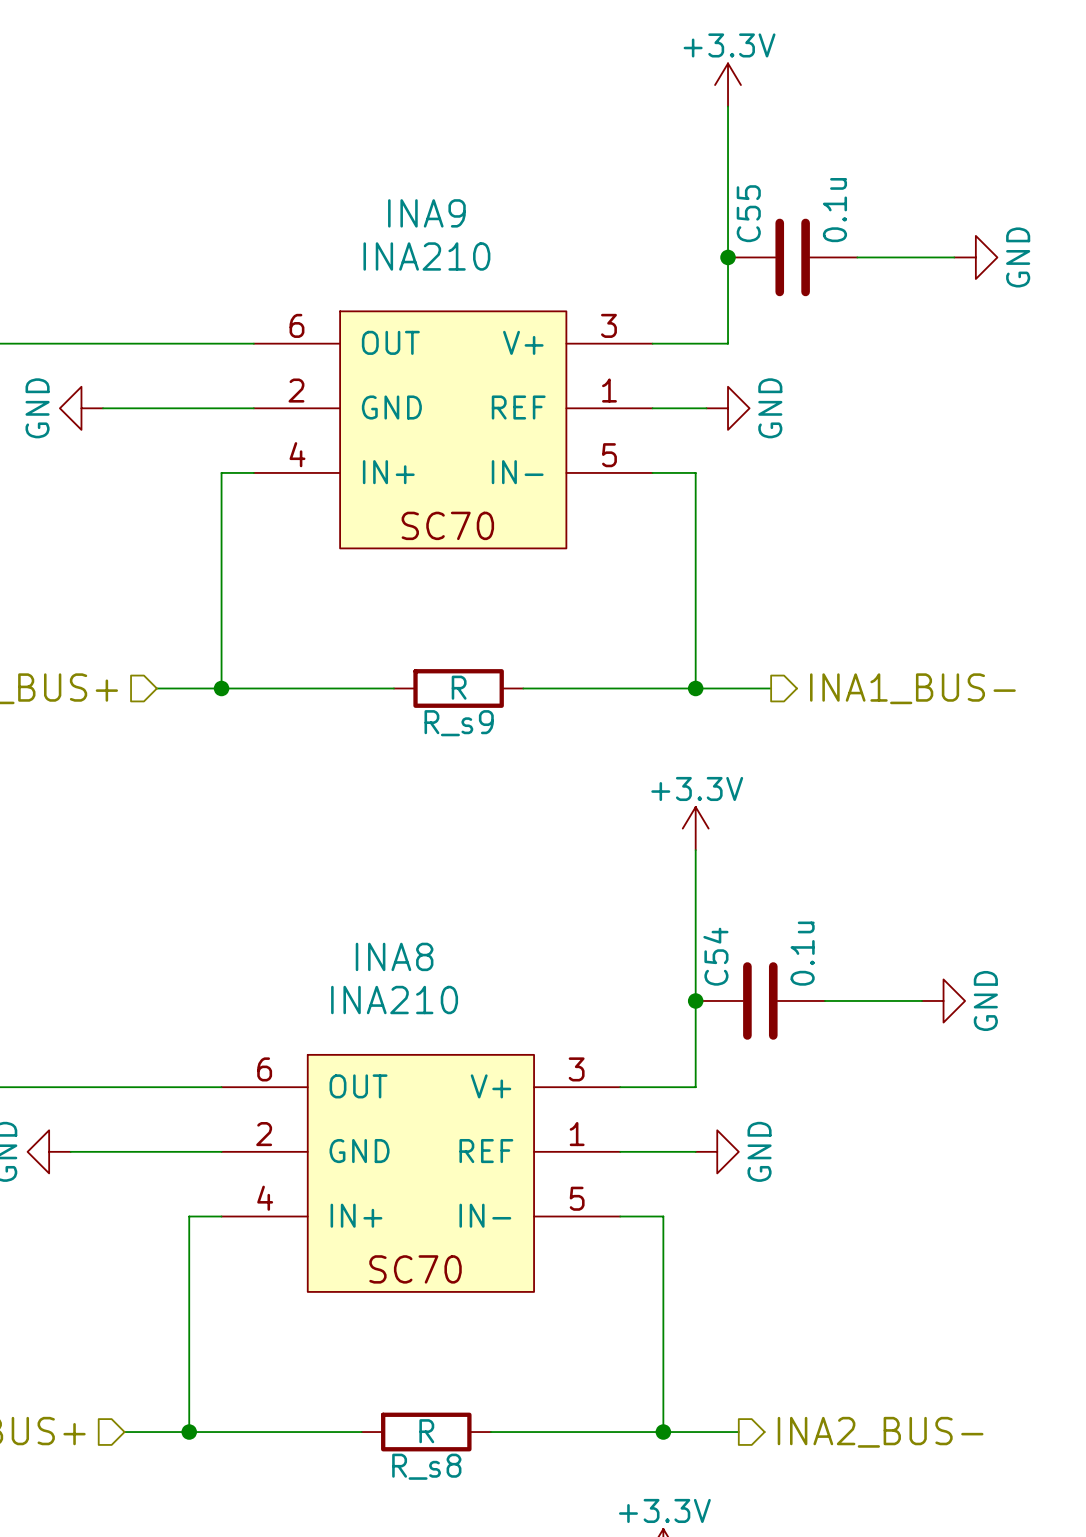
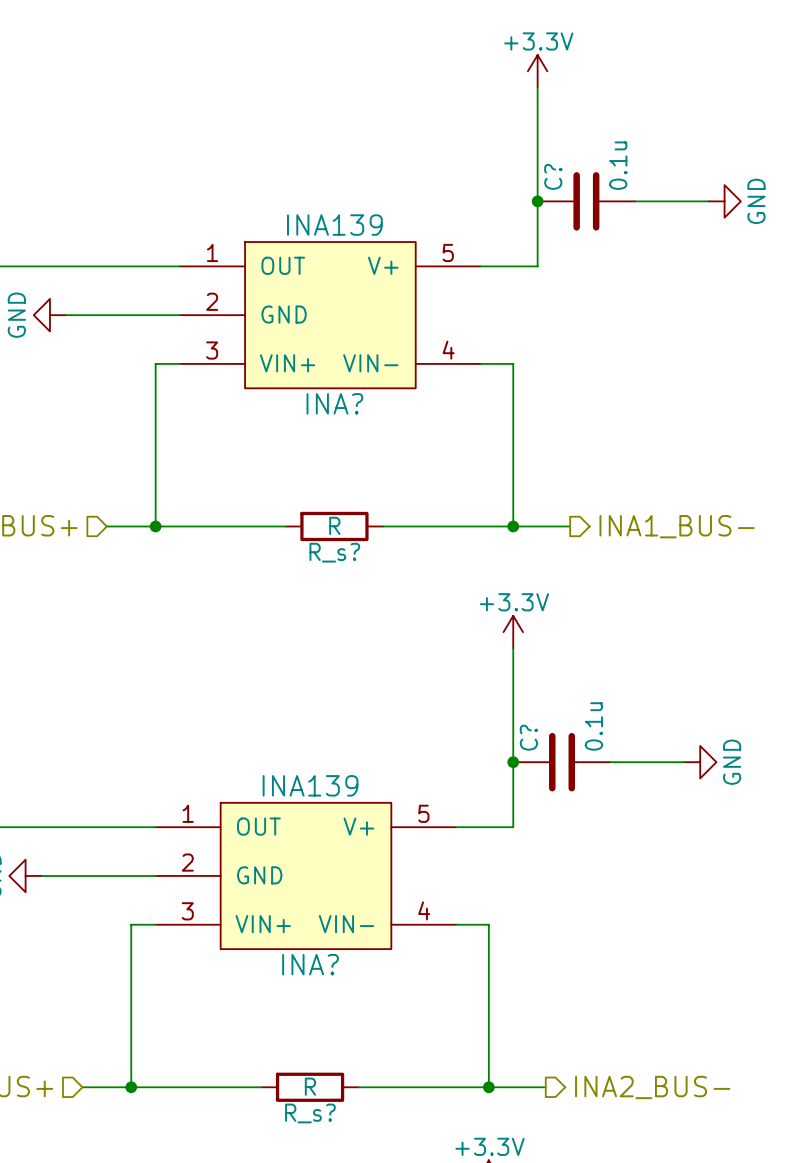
C55 name: C55 (748, 213) -> C? (553, 176)
INA?: none -> INA139 (330, 315)
wire: (652, 408) (706, 408) -> none
power symbol: GND (728, 408) -> none
INA9: INA210 (453, 429) -> none
R_s9 name: R_s9 (459, 723) -> R_s? (334, 552)
C54 name: C54 (715, 956) -> C? (528, 737)
INA?: none -> INA139 (305, 875)
wire: (620, 1151) (695, 1151) -> none
power symbol: GND (717, 1151) -> none
INA8: INA210 (420, 1173) -> none
R_s8 name: R_s8 (426, 1466) -> R_s? (310, 1113)

